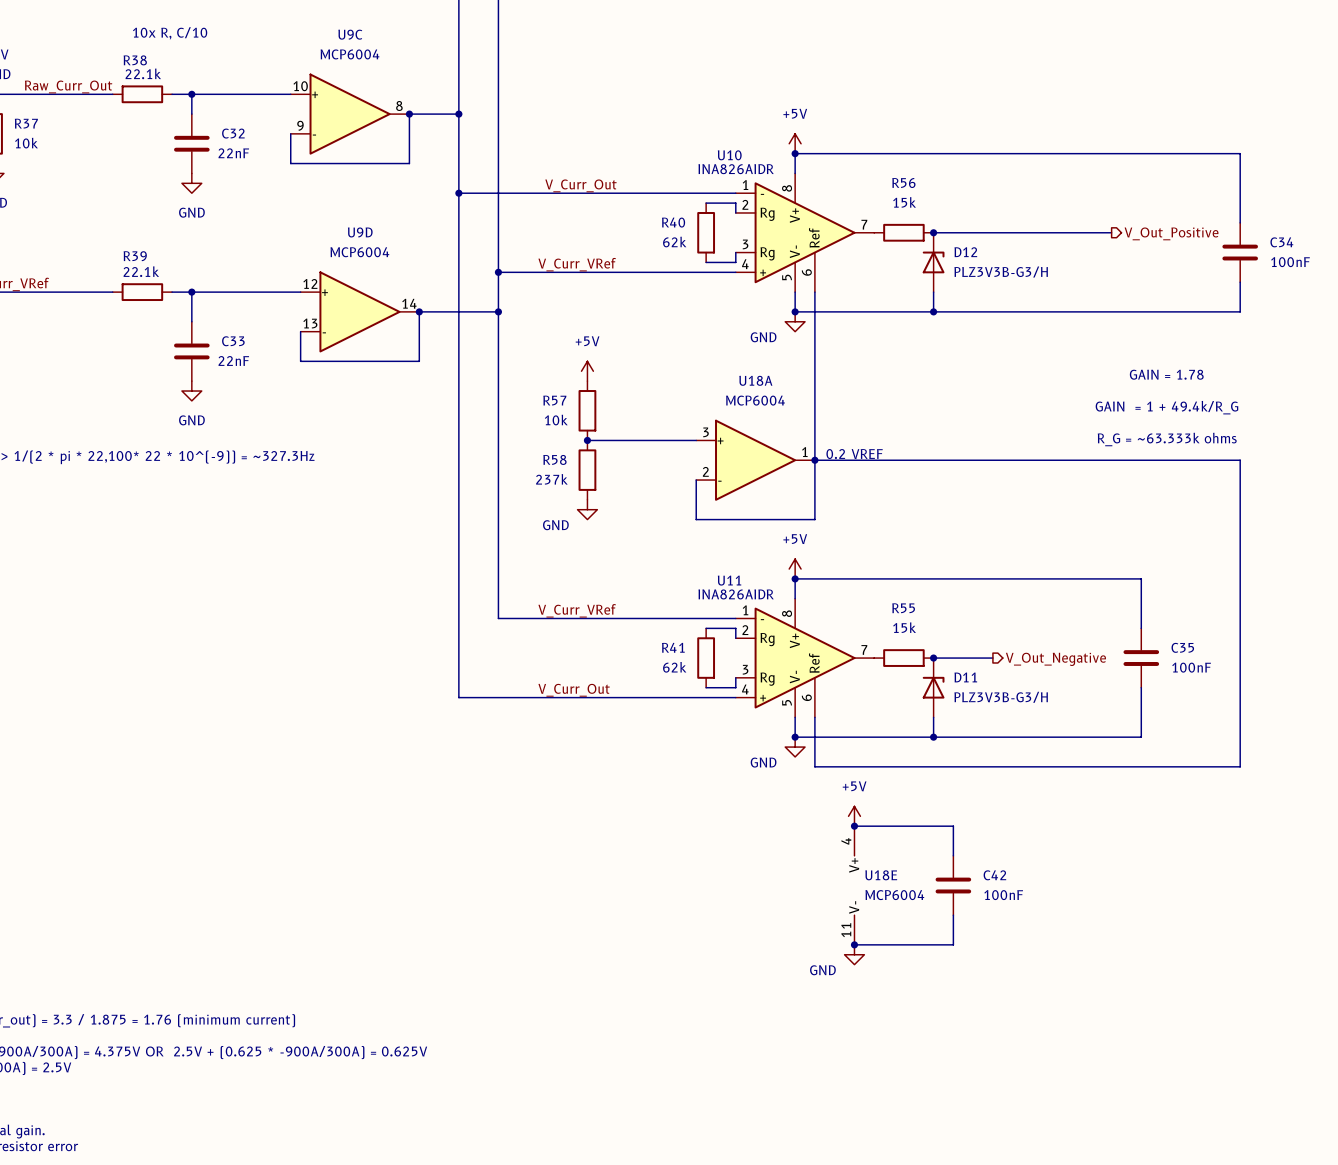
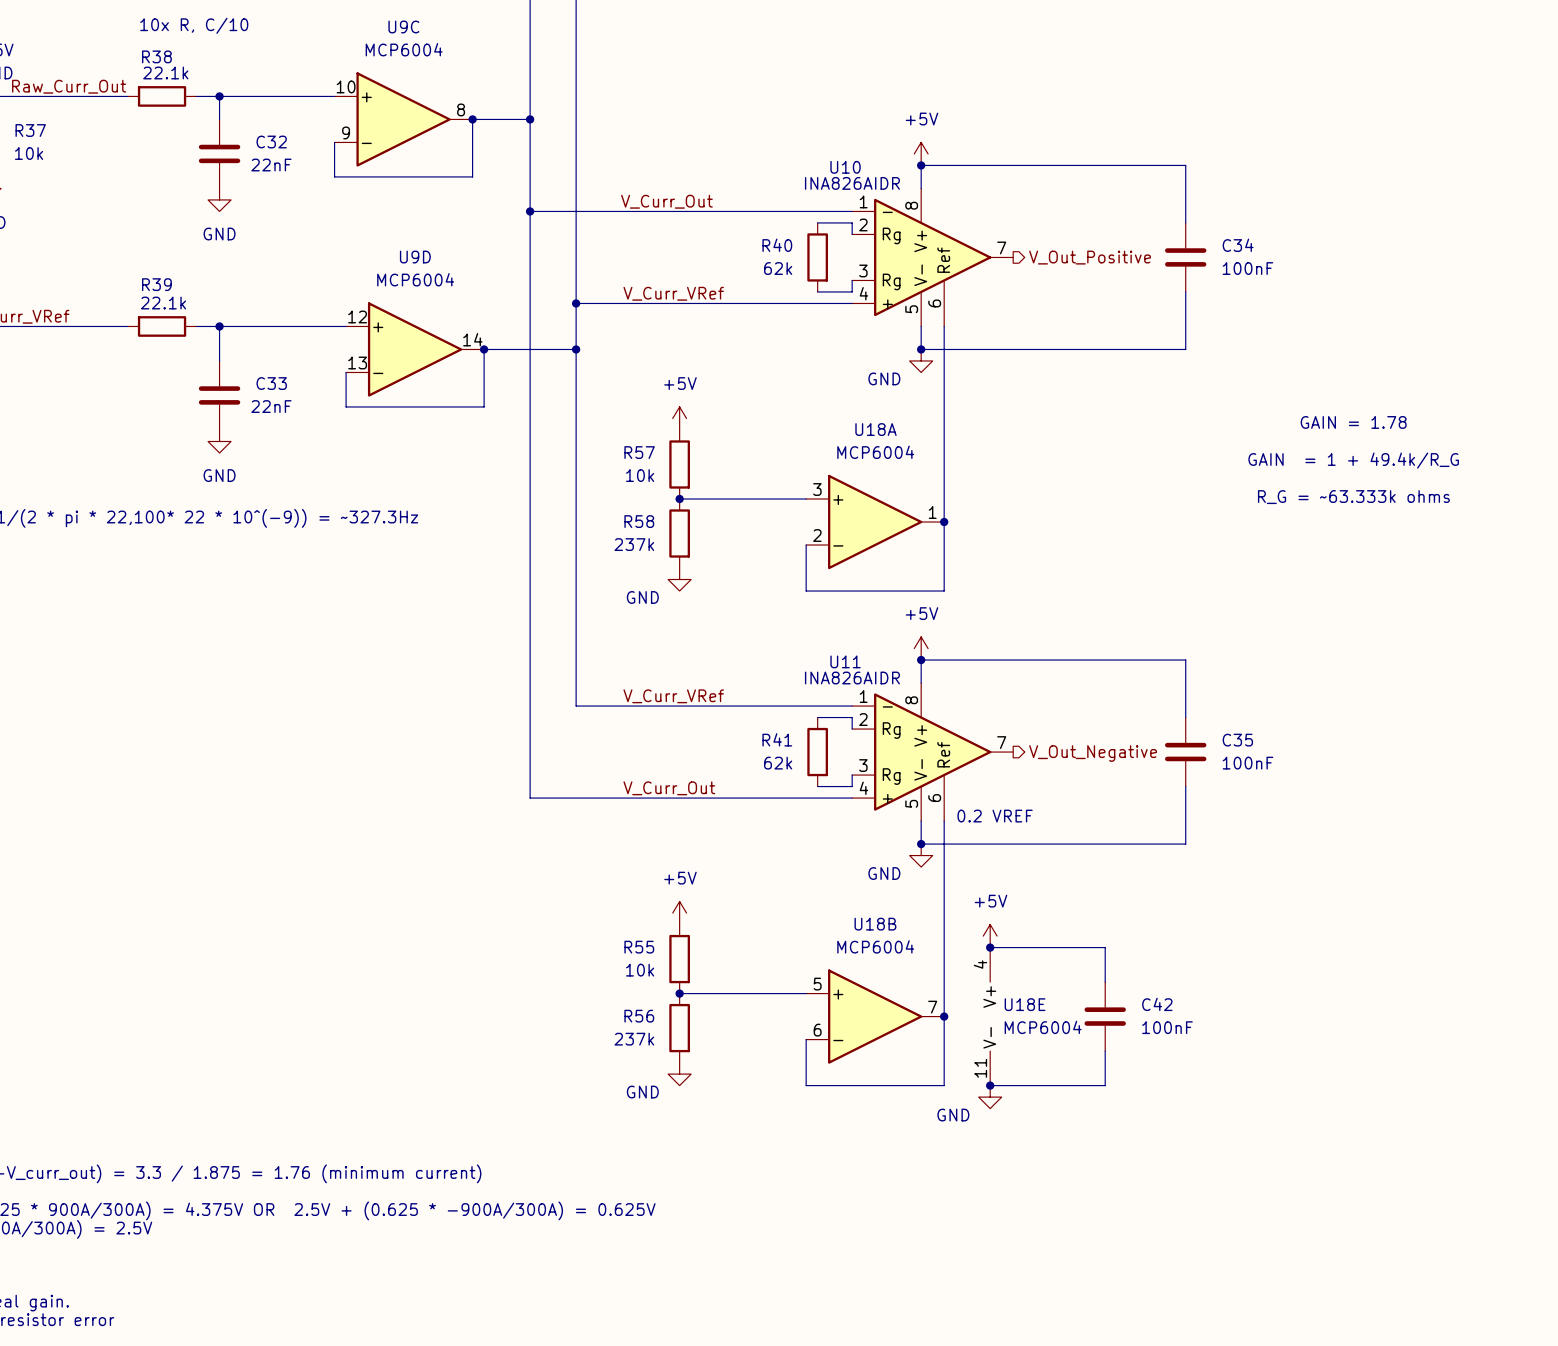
wire: (1022, 153) (1240, 153) (1240, 222) -> (1185, 165) (1185, 222)
R56 name position: R56 (903, 183) -> R56 (639, 1016)
R56 value: 15k (904, 202) -> 237k (634, 1039)
R56 rotation: 0° (903, 232) -> 90° clockwise (679, 1028)
R56 position: (903, 232) -> (679, 1028)
wire: (933, 232) (1111, 232) -> none
junction: (933, 232) -> none
hierarchical label: none -> V_Out_Positive (1090, 257)
hierarchical label: V_Out_Positive (1171, 233) -> none
C34 position: (1240, 252) -> (1185, 257)
D12: PLZ3V3B-G3/H (933, 262) -> none
wire: (1240, 282) (1240, 311) (1022, 311) -> (1185, 291) (1185, 349)
wire: (933, 292) (933, 311) -> none
junction: (933, 311) -> none
text: 0.2 VREF (854, 454) -> none
wire: (814, 460) (1240, 460) (1240, 766) (814, 766) -> (806, 1039) (806, 1085) (944, 1085) (944, 878)
wire: (1022, 578) (1141, 578) (1141, 628) -> (1185, 660) (1185, 717)
R55 name position: R55 (903, 608) -> R55 (639, 947)
R55 value: 15k (904, 627) -> 10k (640, 970)
R55 rotation: 0° (903, 658) -> 90° clockwise (679, 959)
R55 position: (903, 658) -> (679, 959)
wire: (933, 658) (992, 658) -> none
junction: (933, 658) -> none
C35 position: (1141, 658) -> (1185, 752)
hierarchical label position: V_Out_Negative (1055, 659) -> V_Out_Negative (1093, 753)
D11: PLZ3V3B-G3/H (933, 687) -> none
wire: (1141, 687) (1141, 737) (1022, 737) -> (1185, 786) (1185, 844)
text: none -> 0.2 VREF (995, 816)
wire: (933, 717) (933, 737) -> none
junction: (933, 737) -> none
power symbol: none -> +5V (679, 913)
wire: none -> (679, 993) (806, 993)
junction: none -> (679, 993)
U18B: none -> MCP6004 (875, 1016)
junction: none -> (944, 1016)
power symbol: none -> GND (679, 1074)

